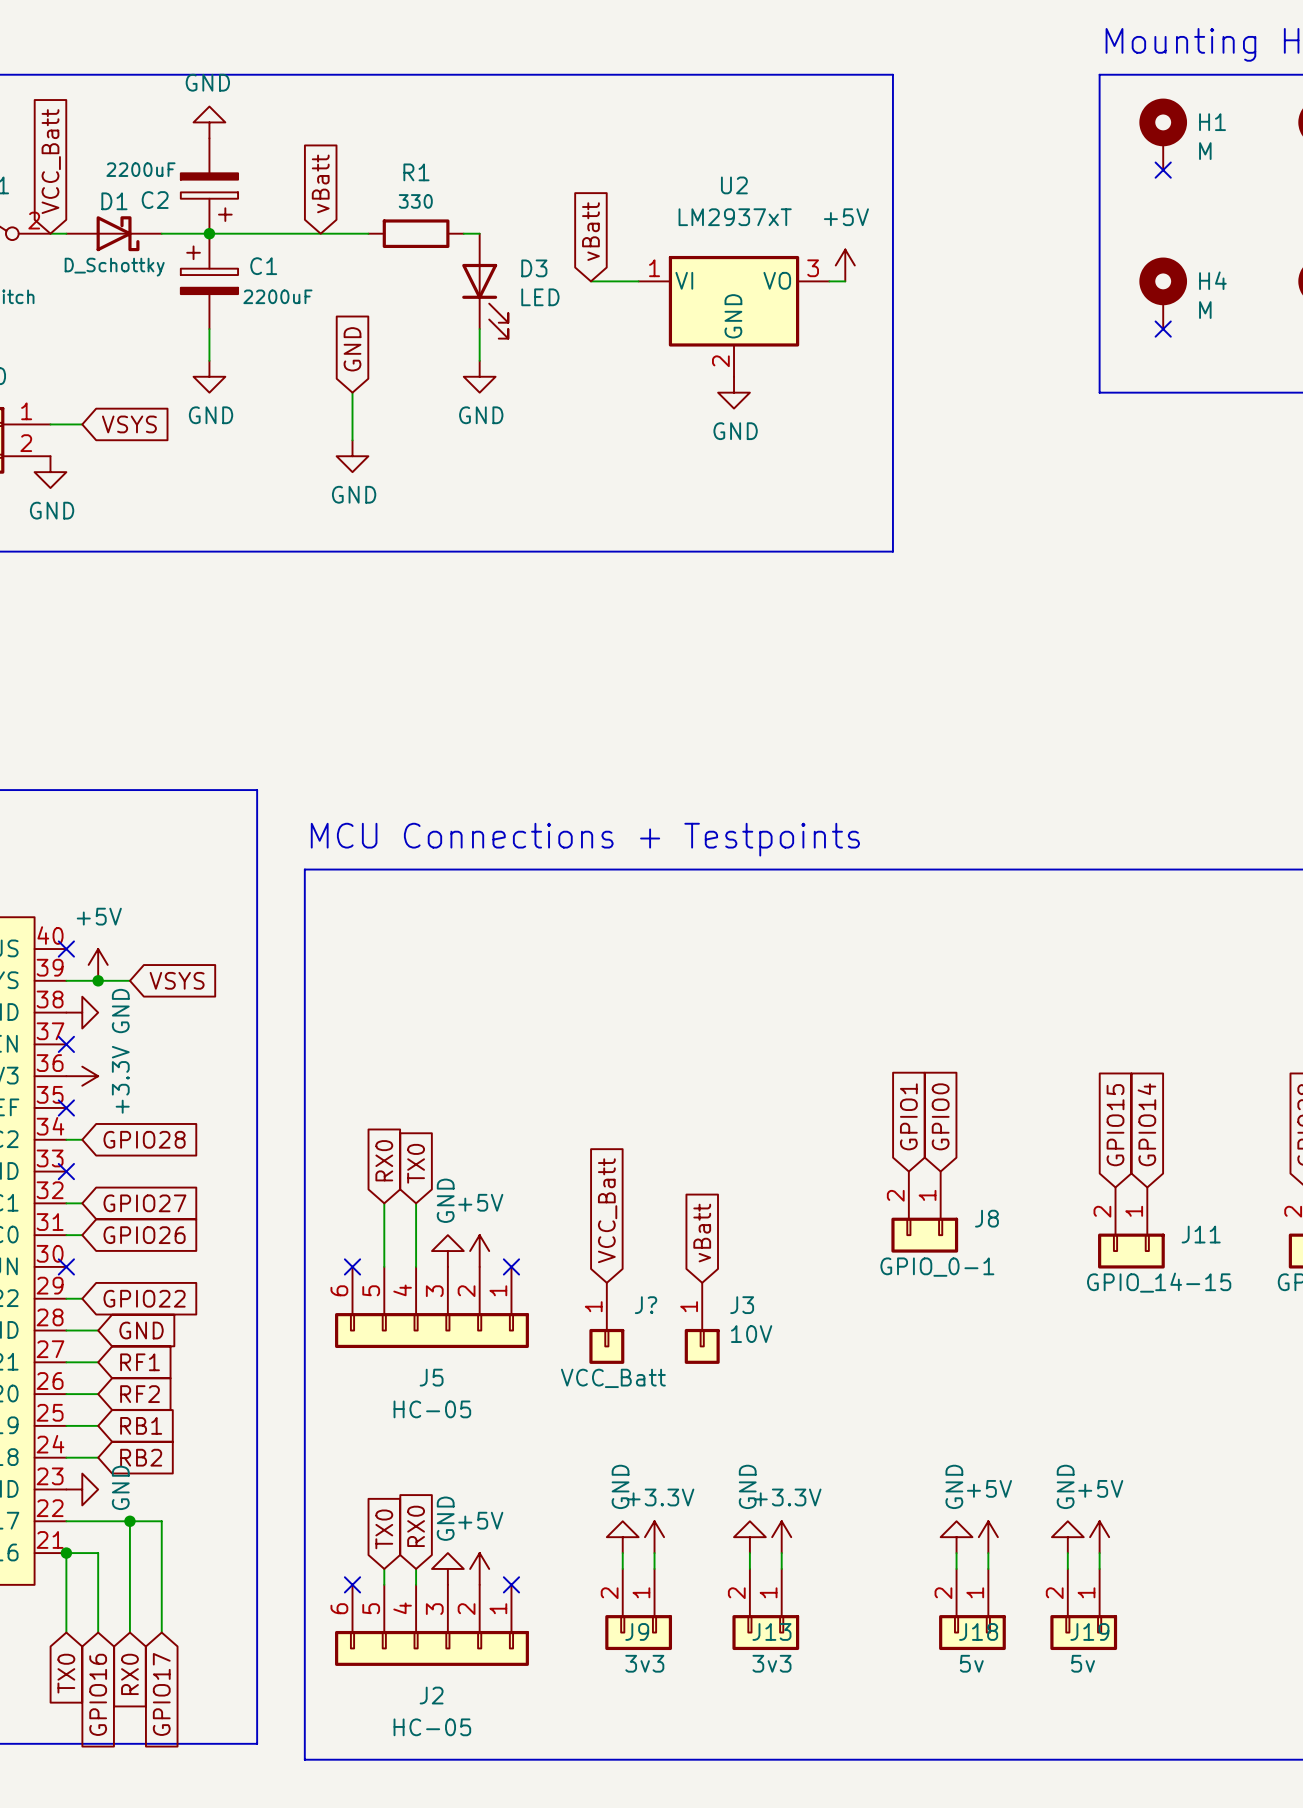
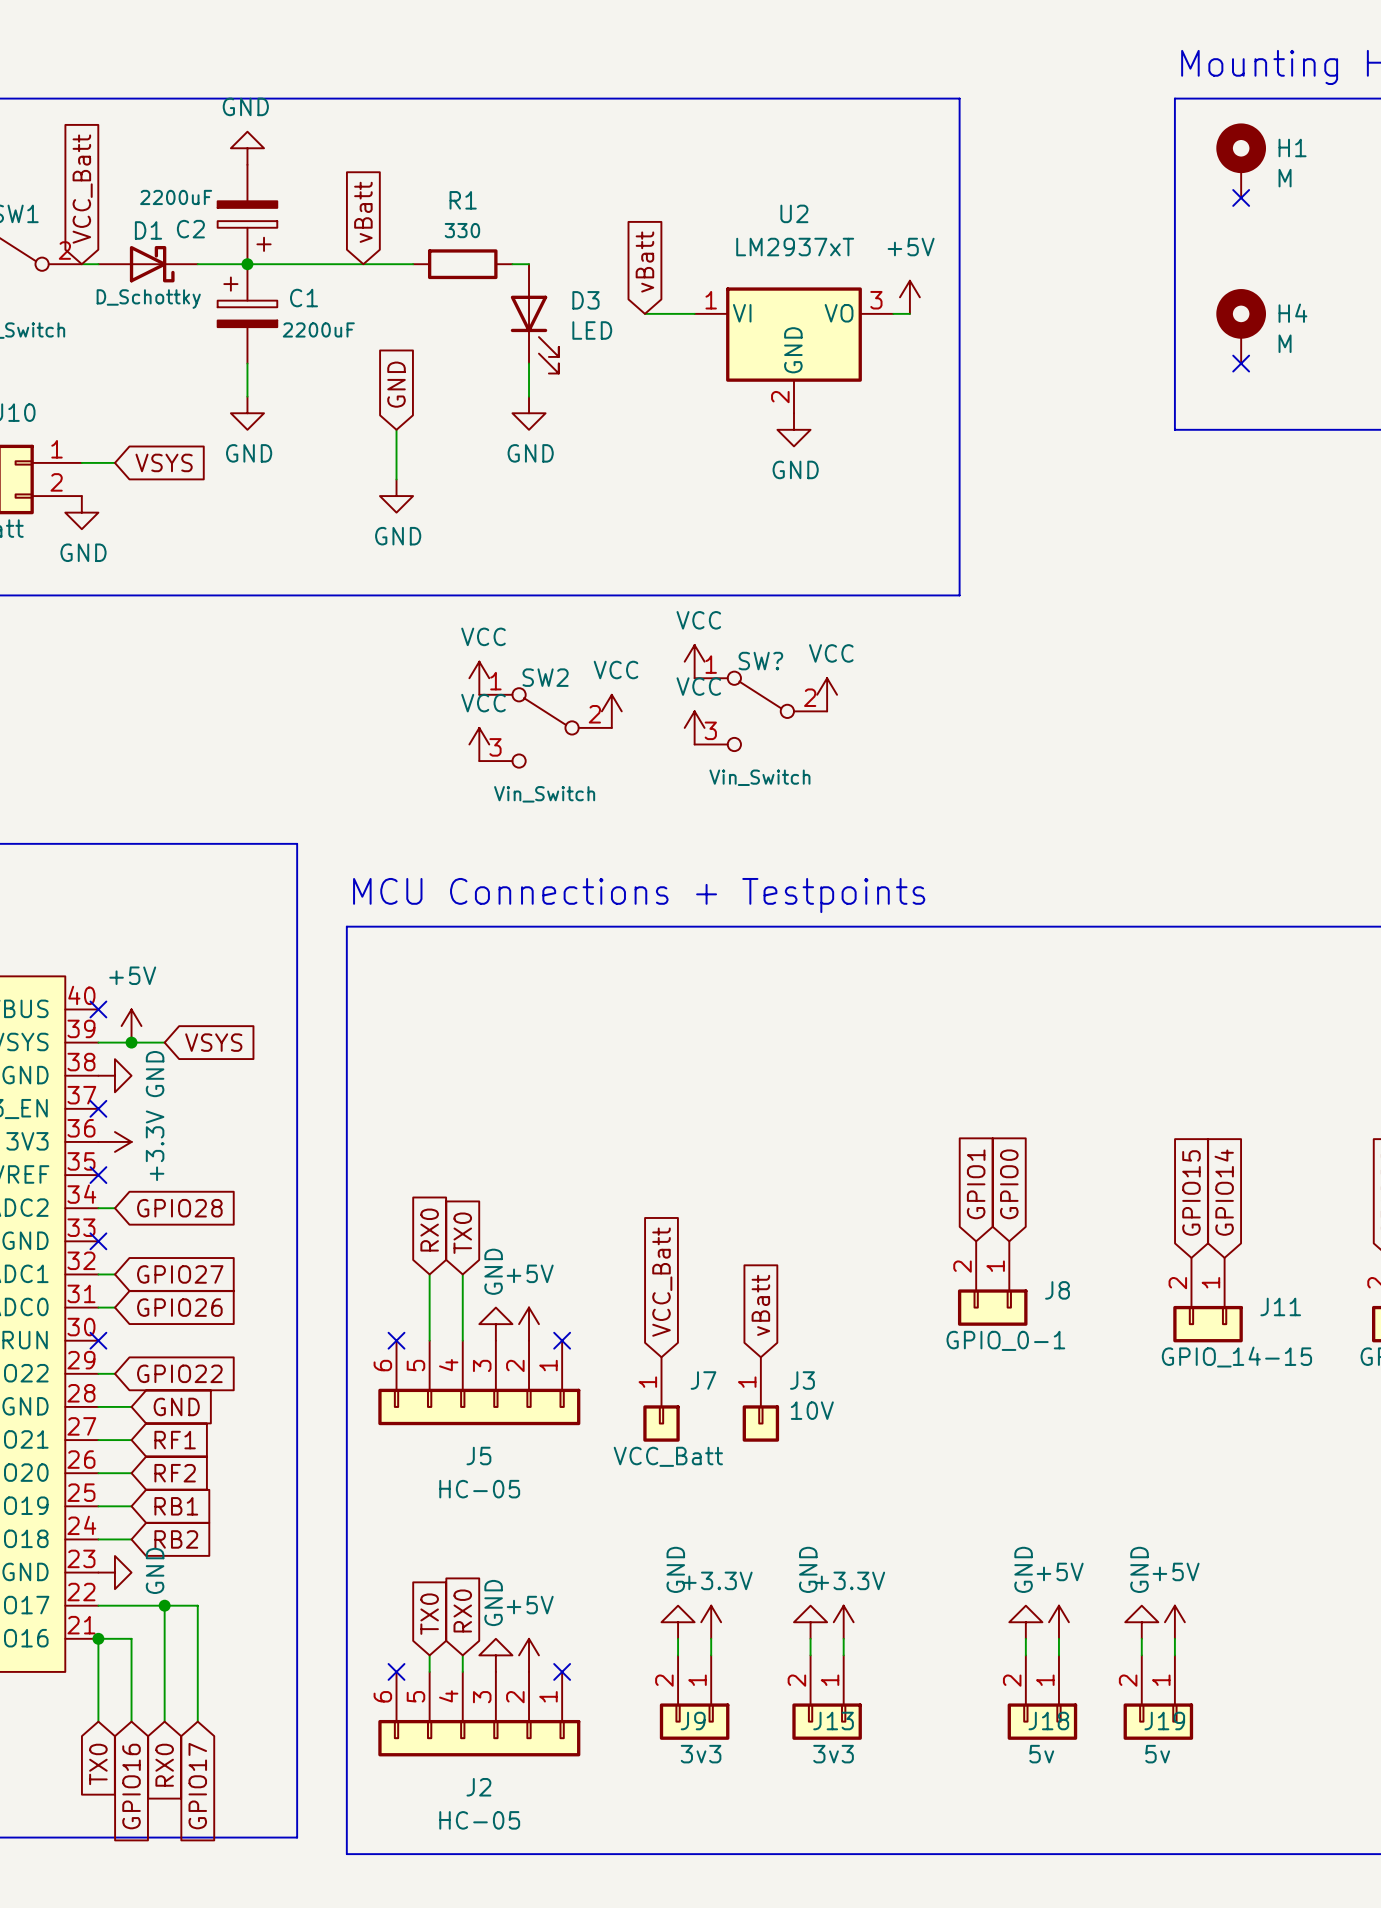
power symbol: none -> VCC (694, 661)
power symbol: none -> VCC (479, 678)
power symbol: none -> VCC (827, 694)
power symbol: none -> VCC (611, 711)
SW?: none -> Vin_Switch (760, 711)
SW2: none -> Vin_Switch (545, 727)
power symbol: none -> VCC (694, 727)
power symbol: none -> VCC (479, 744)
J? name: J? (646, 1305) -> J7 (703, 1380)

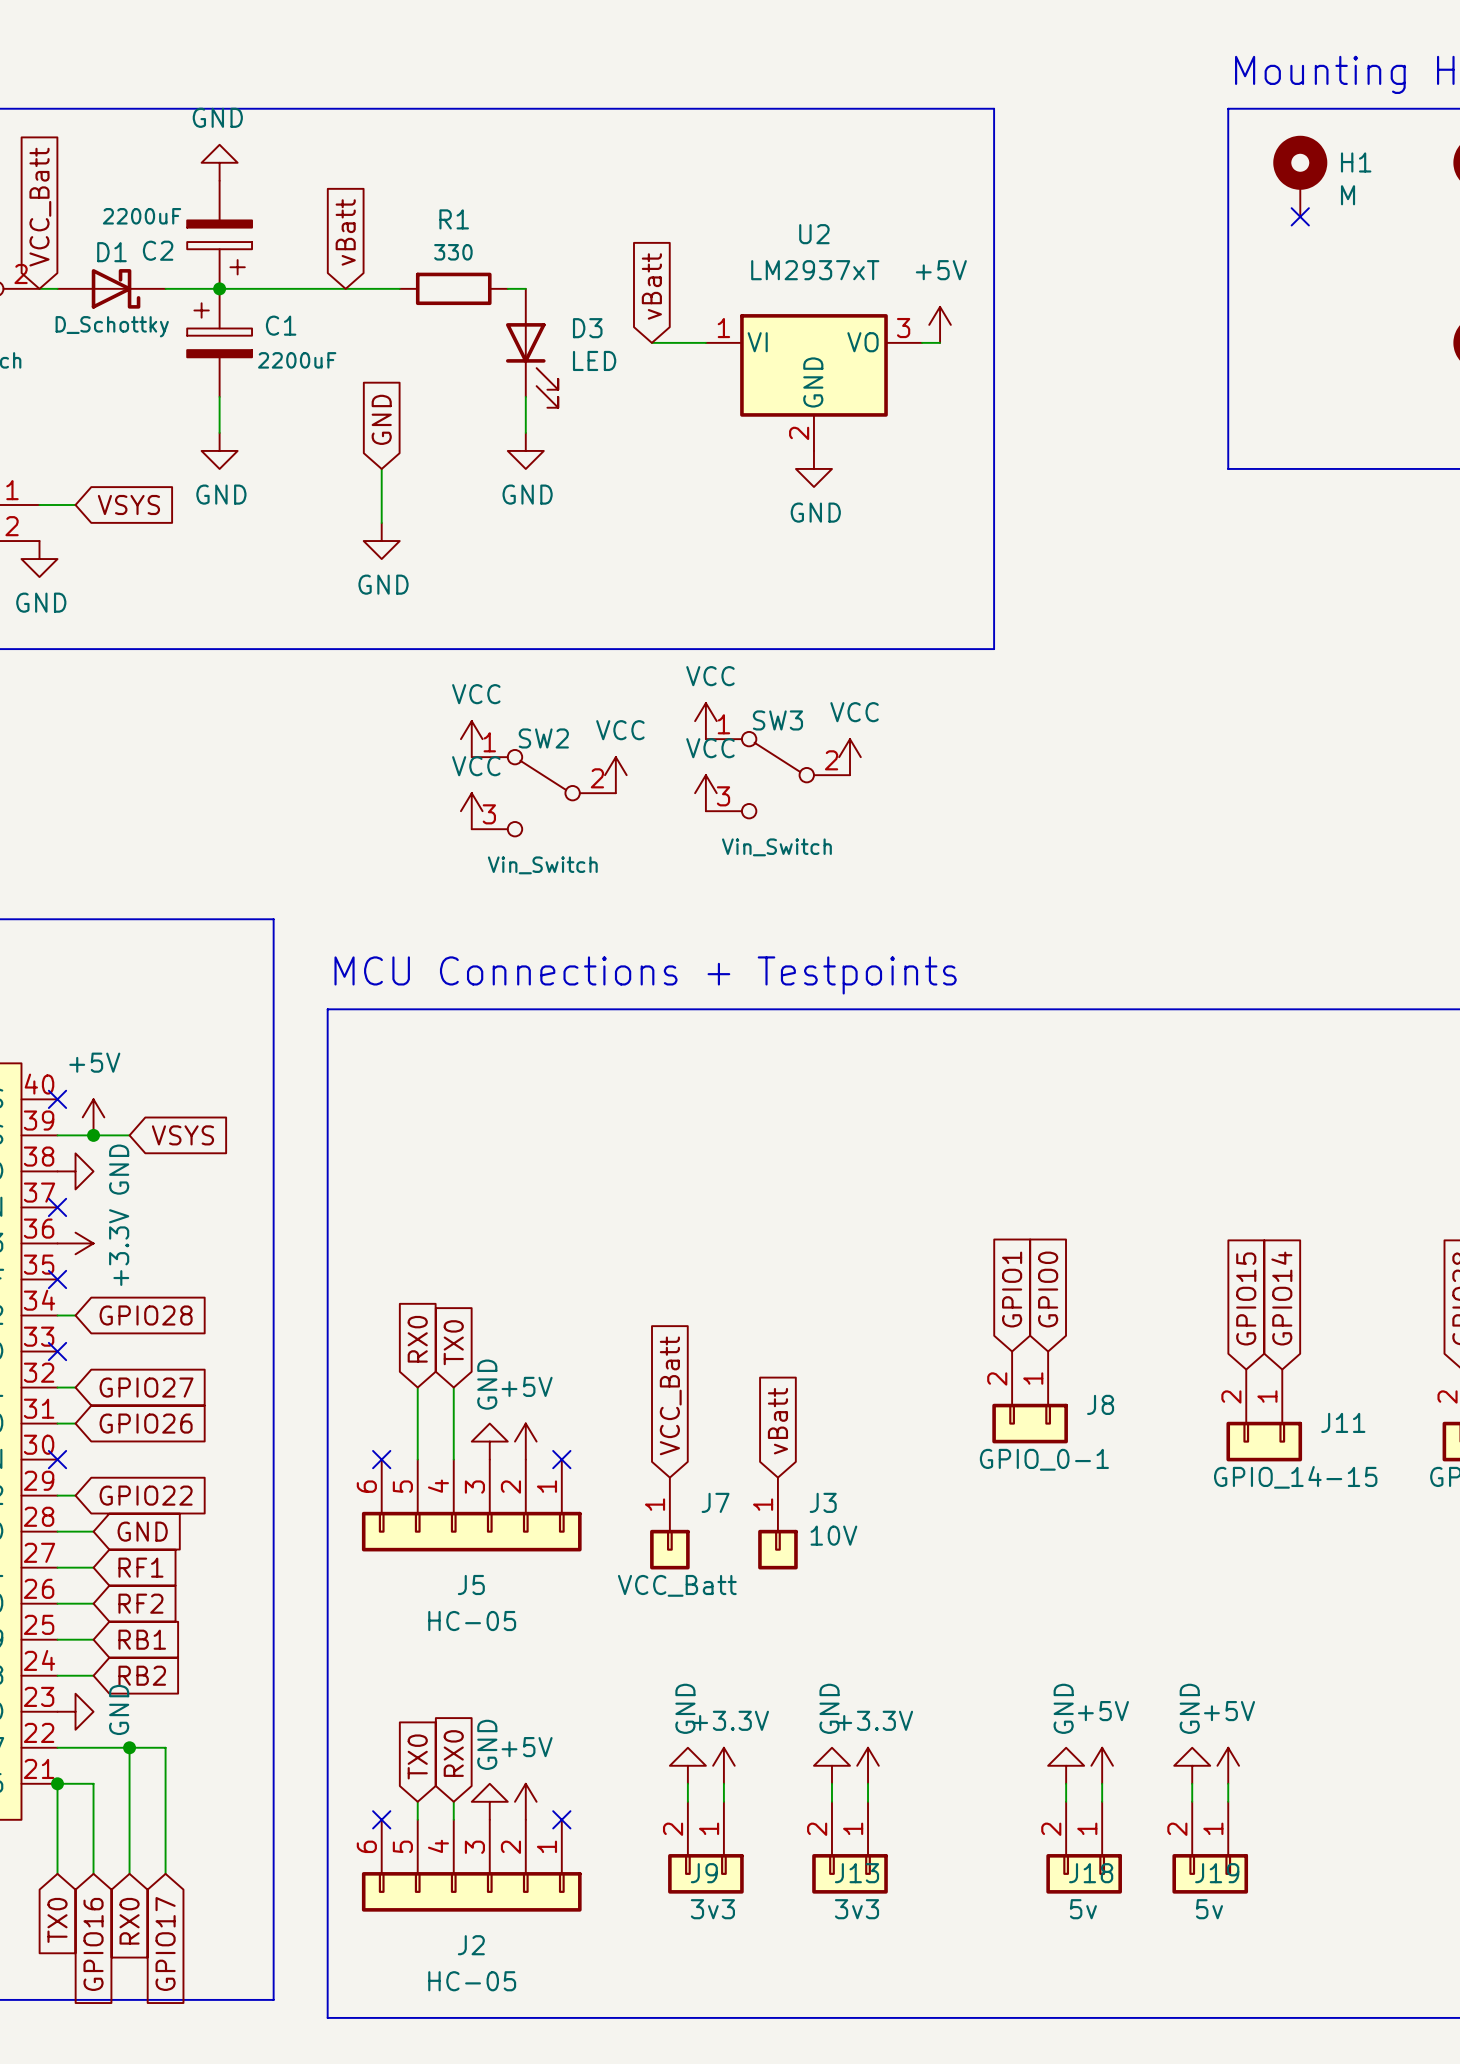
H4: M (1241, 326) -> none
no-connect mark: (1241, 363) -> none
SW? name: SW? (760, 661) -> SW3 (777, 720)

